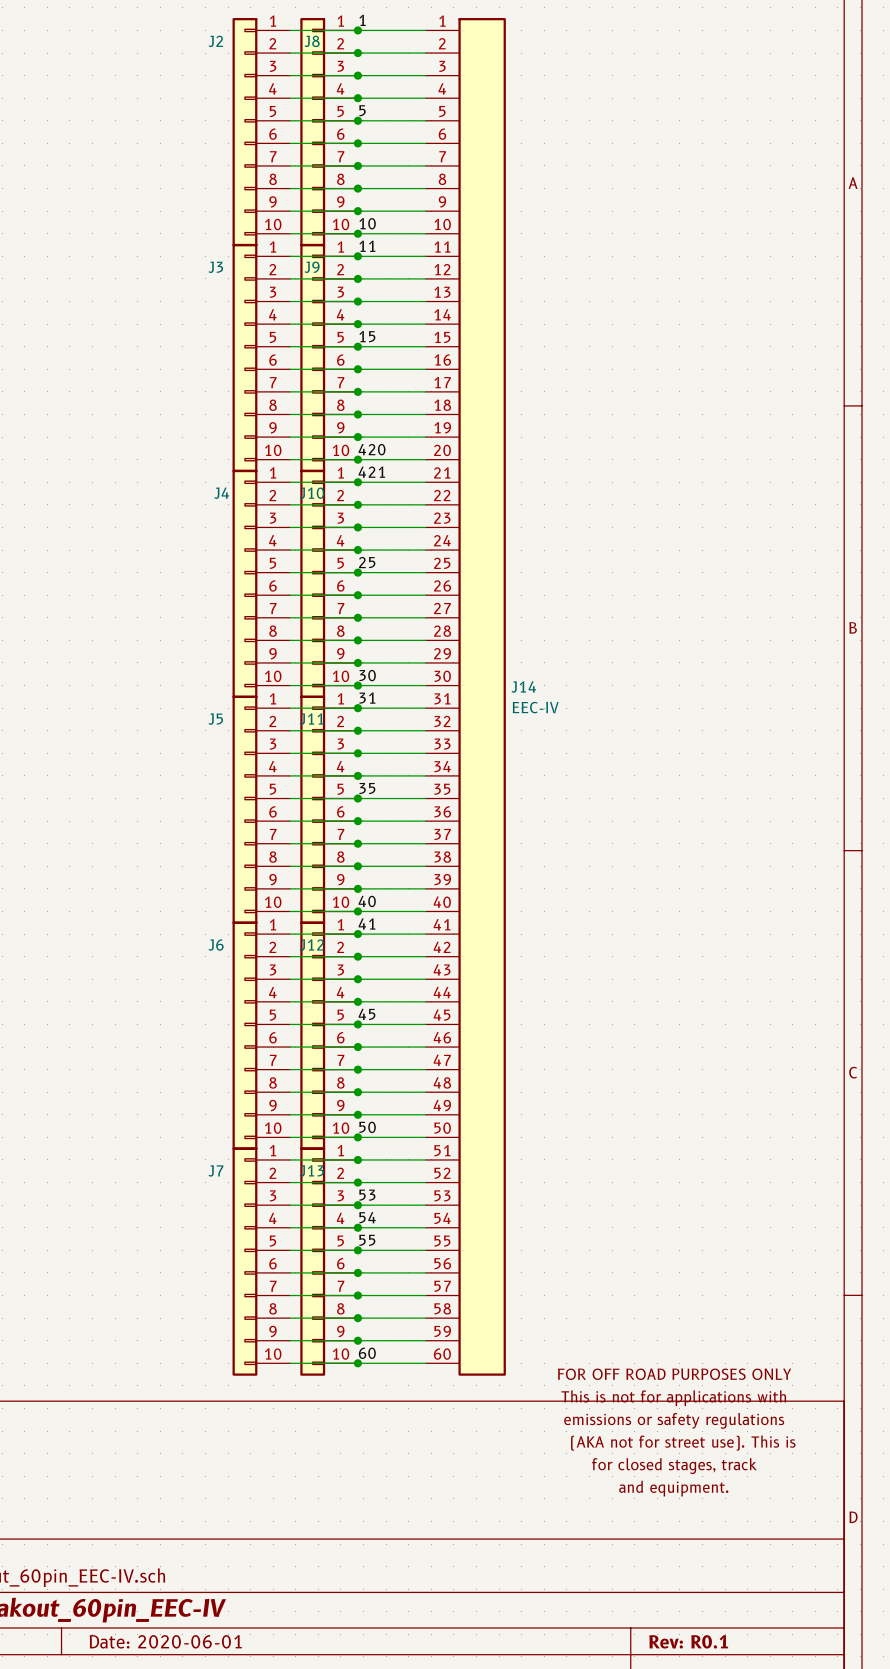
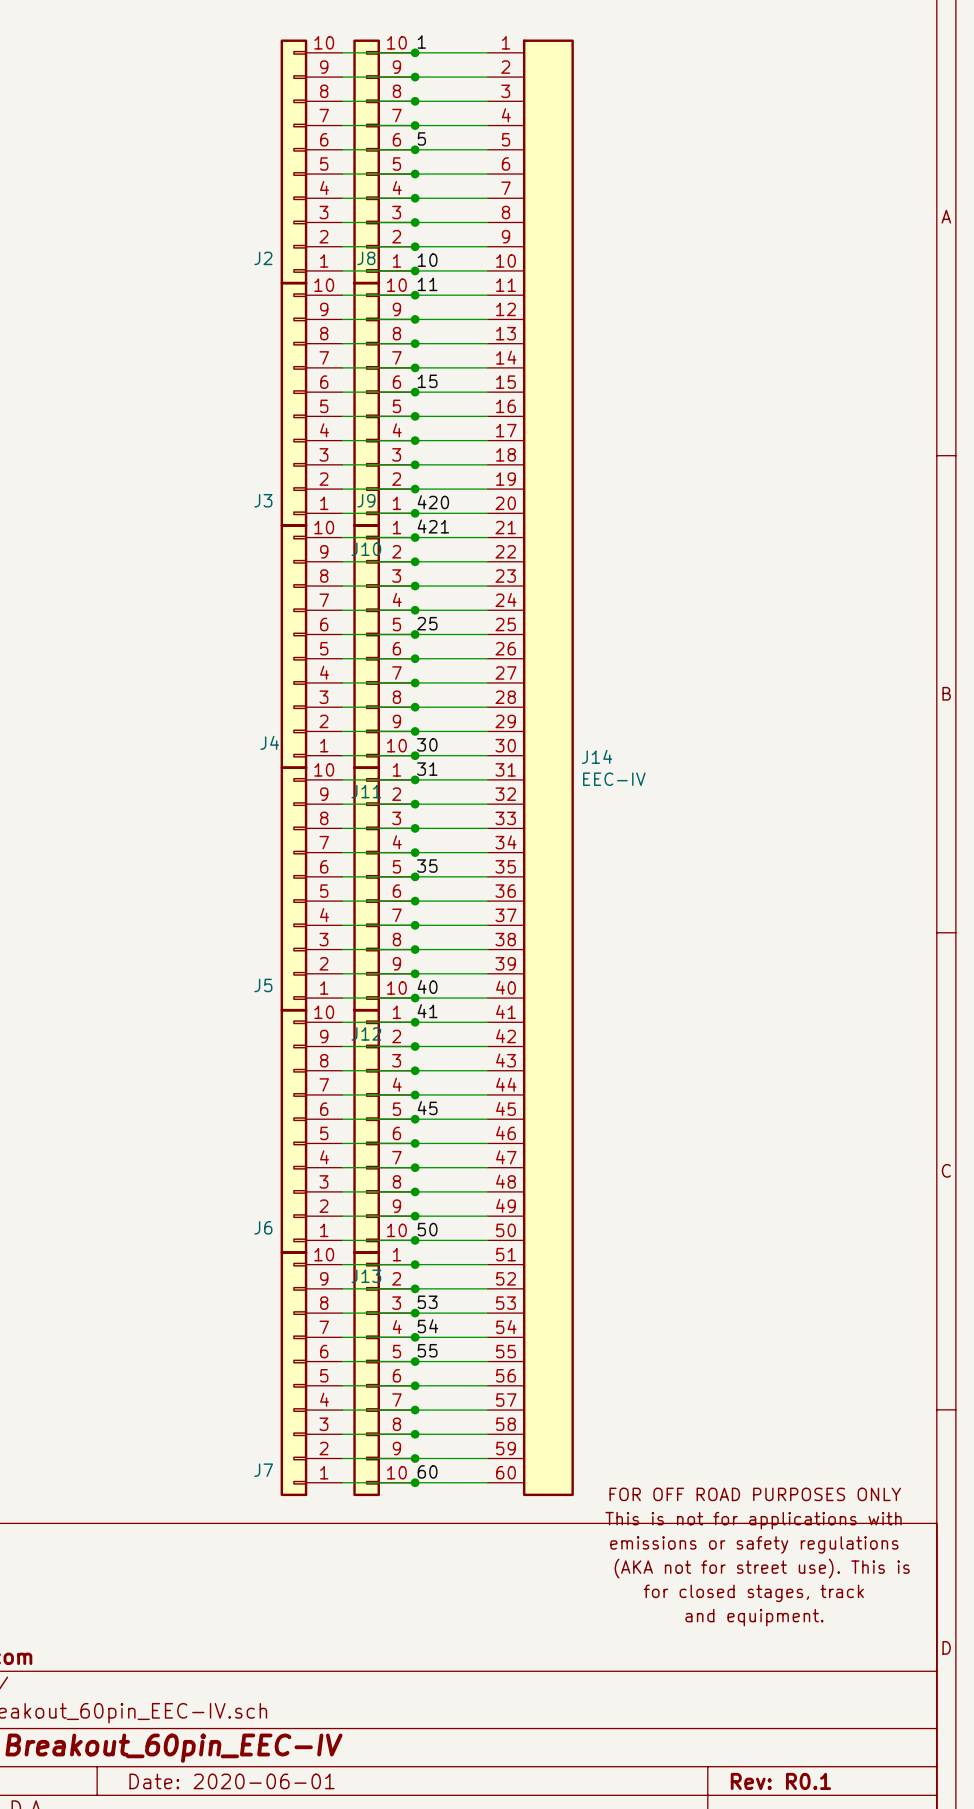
J2 flip: as is (244, 132) -> up-down (293, 161)
J8 flip: as is (312, 132) -> up-down (366, 161)
J3 flip: as is (244, 358) -> up-down (293, 404)
J9 flip: as is (312, 358) -> up-down (366, 404)
J4 flip: as is (244, 583) -> up-down (293, 646)
J5 flip: as is (244, 809) -> up-down (293, 888)
J6 flip: as is (244, 1035) -> up-down (293, 1131)
J7 flip: as is (244, 1261) -> up-down (293, 1373)

